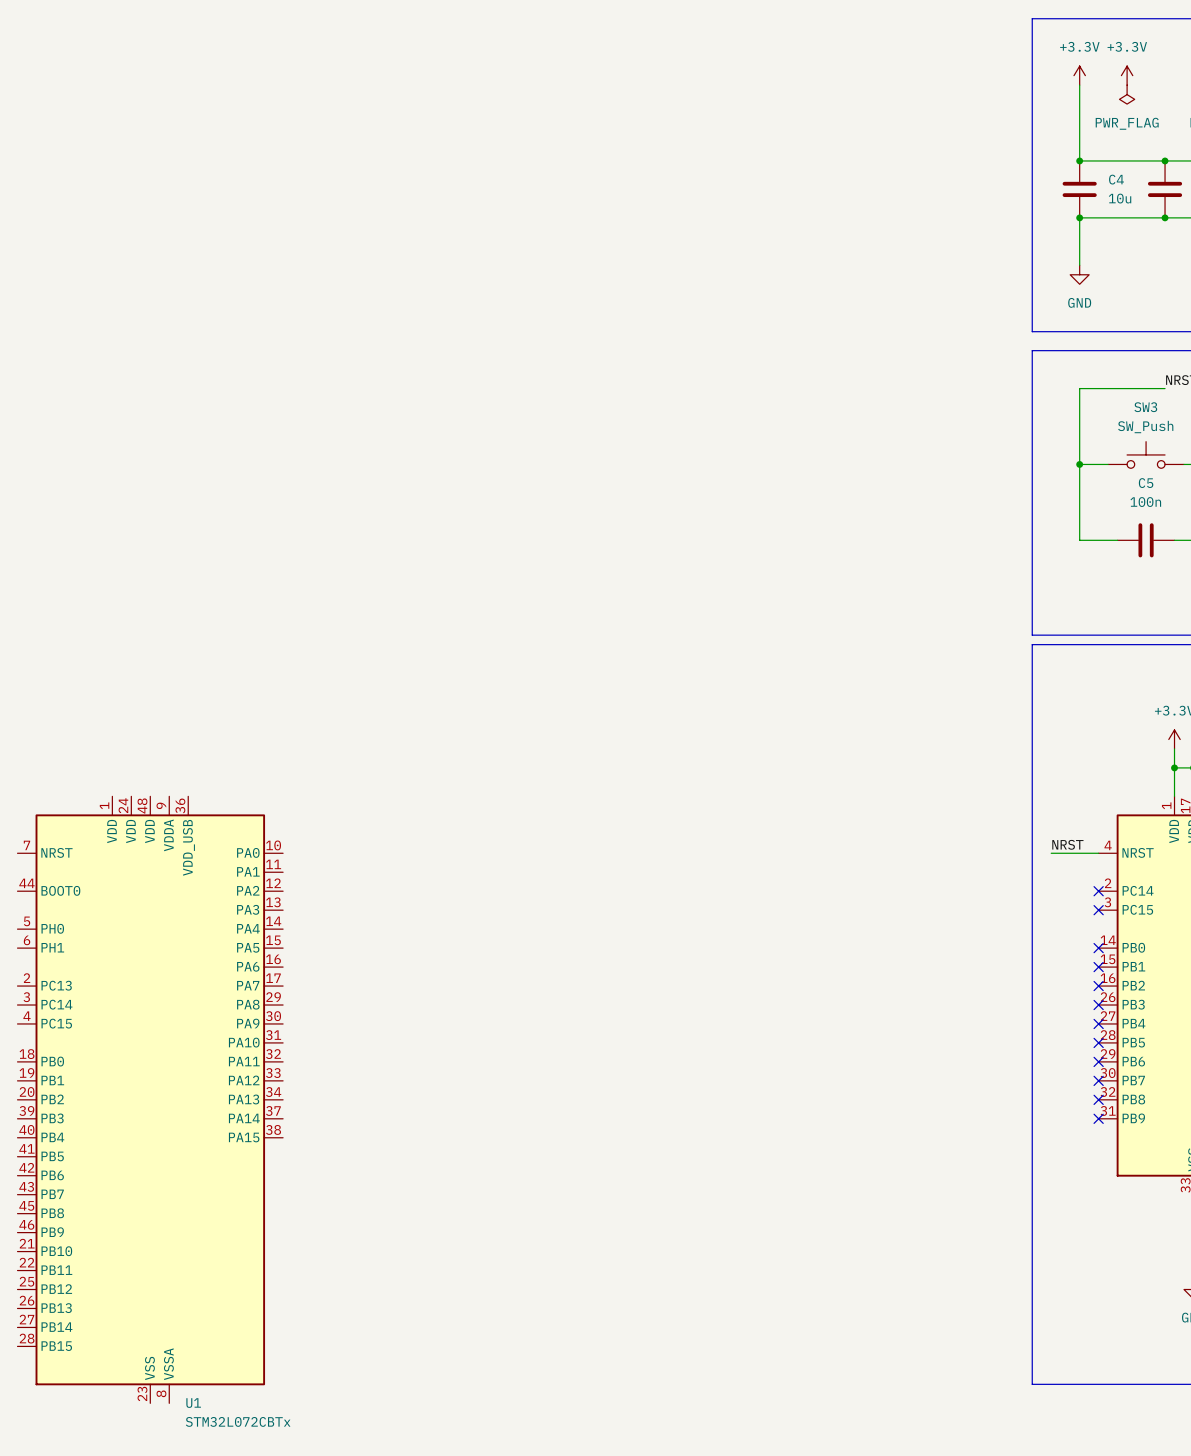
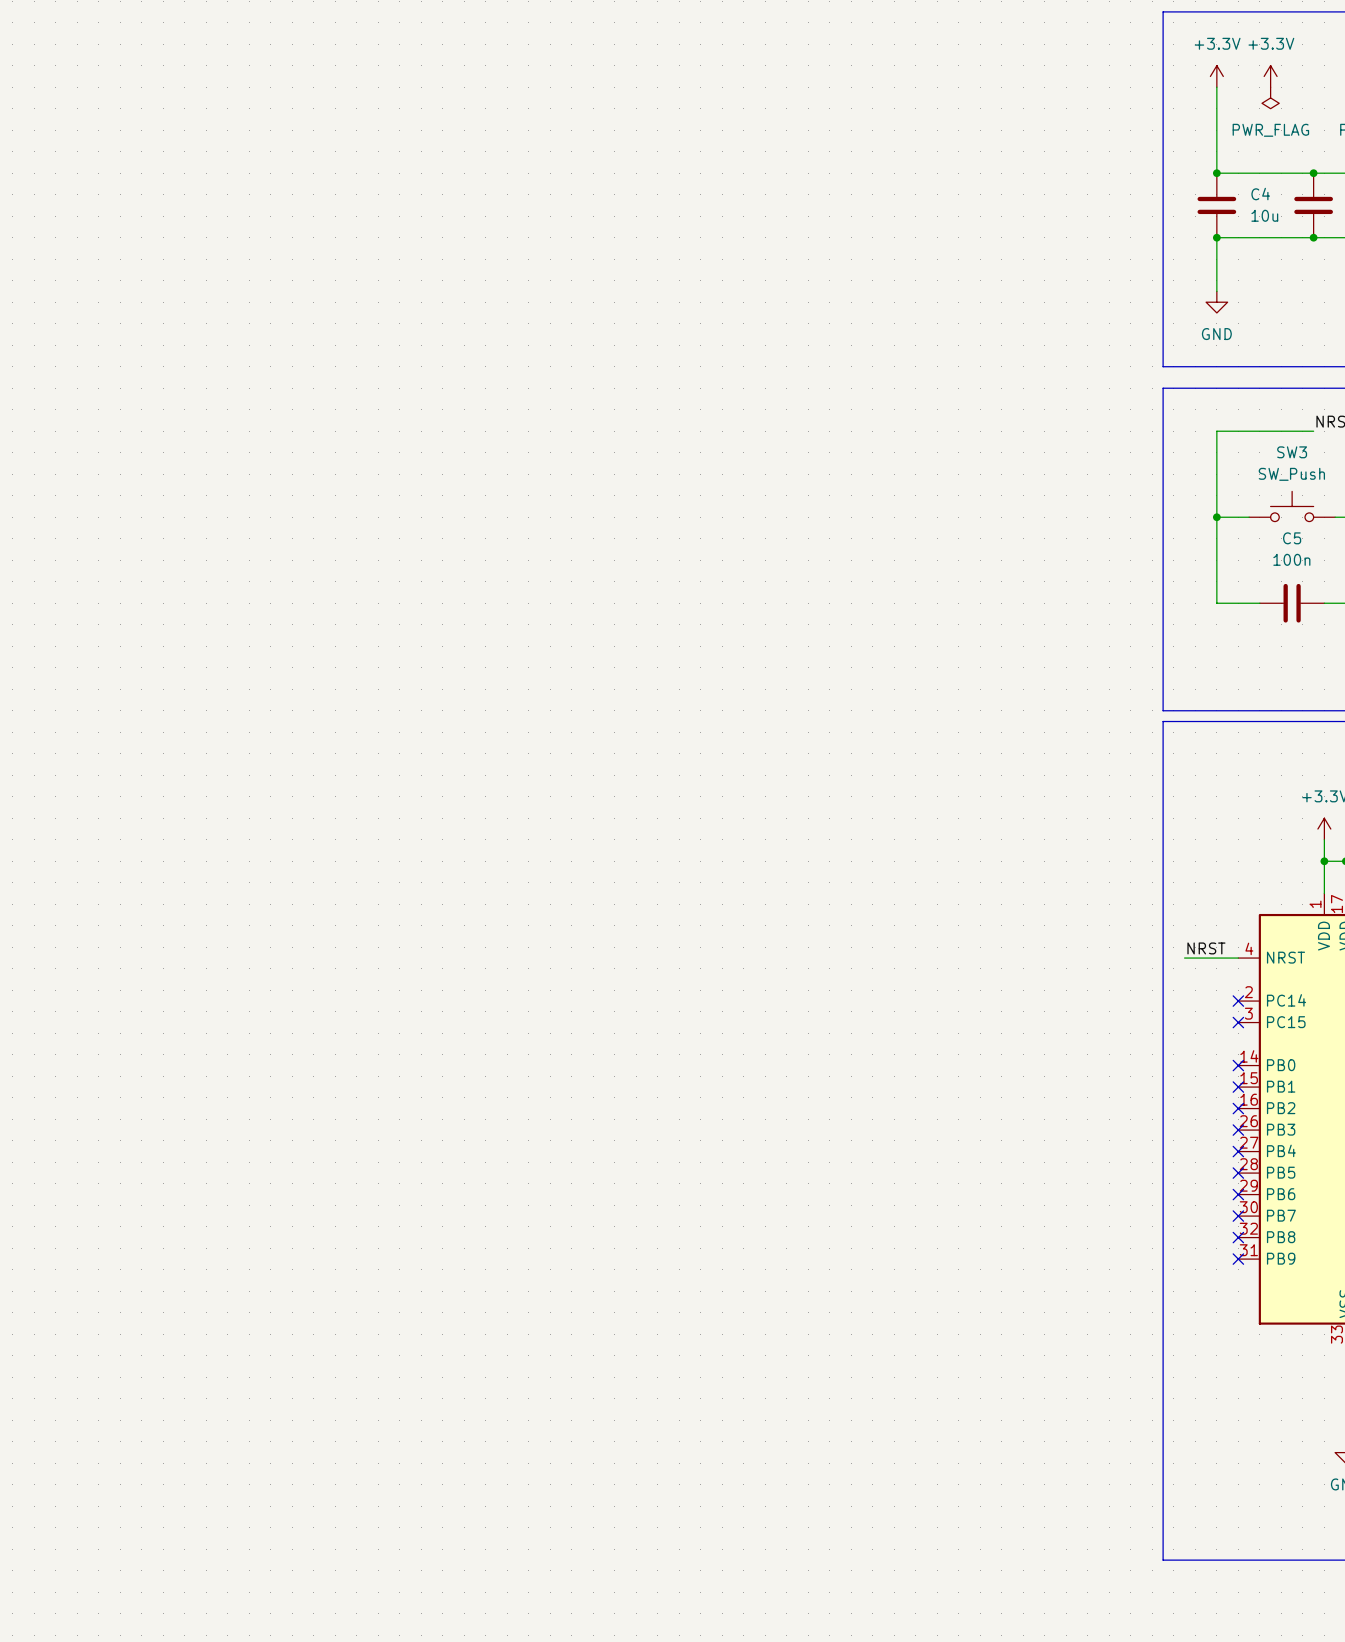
U1: STM32L072CBTx (150, 1099) -> none

